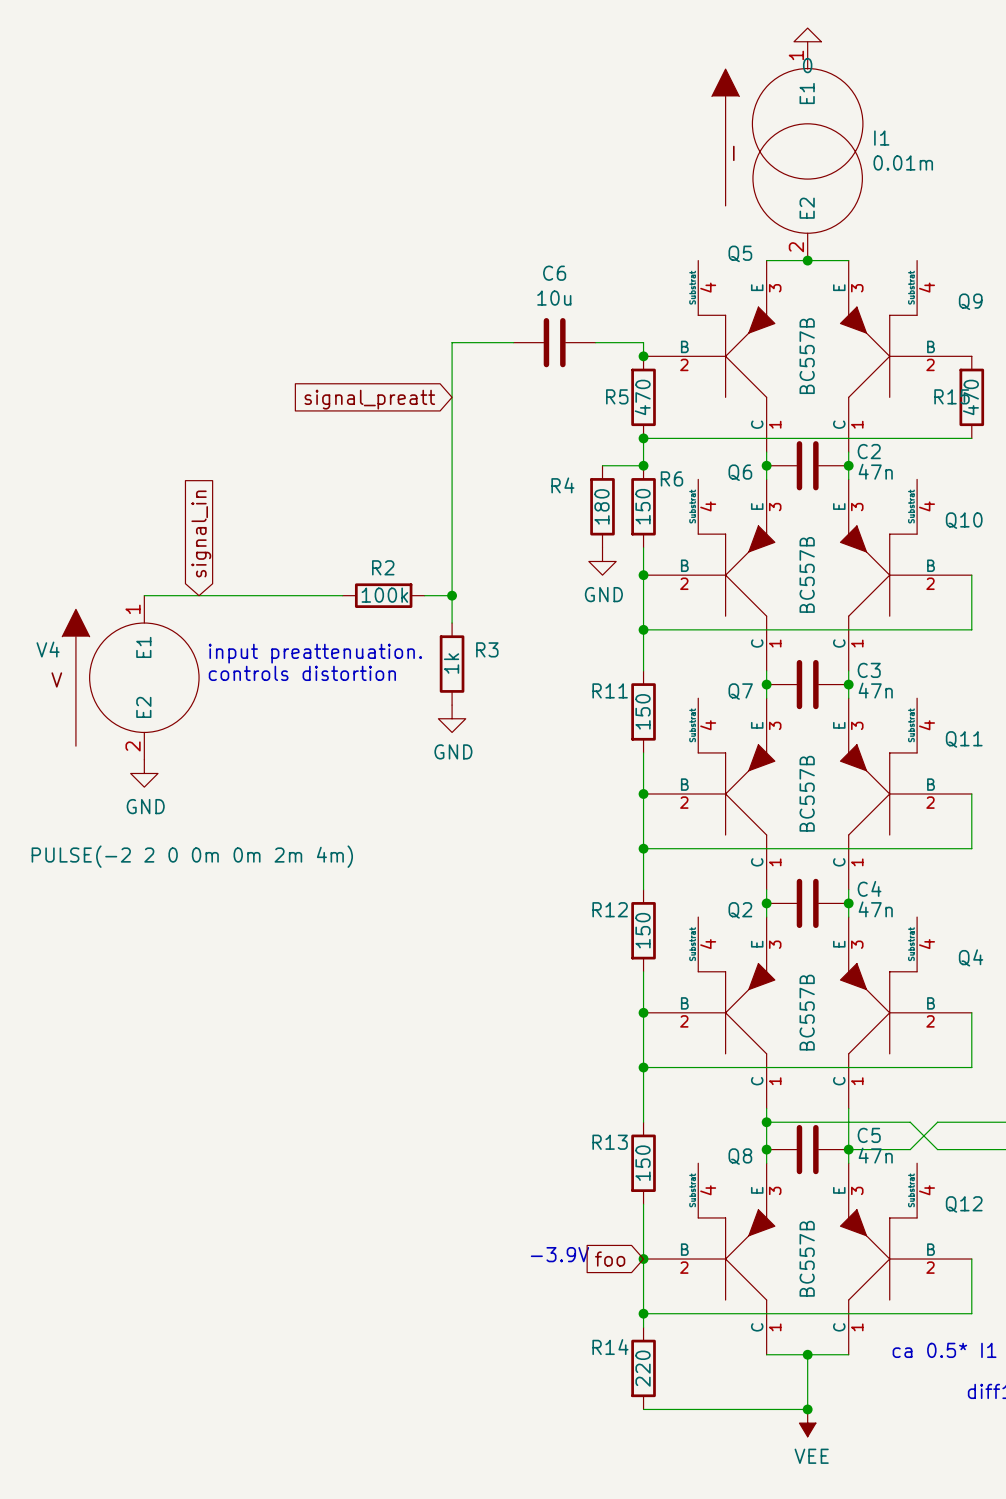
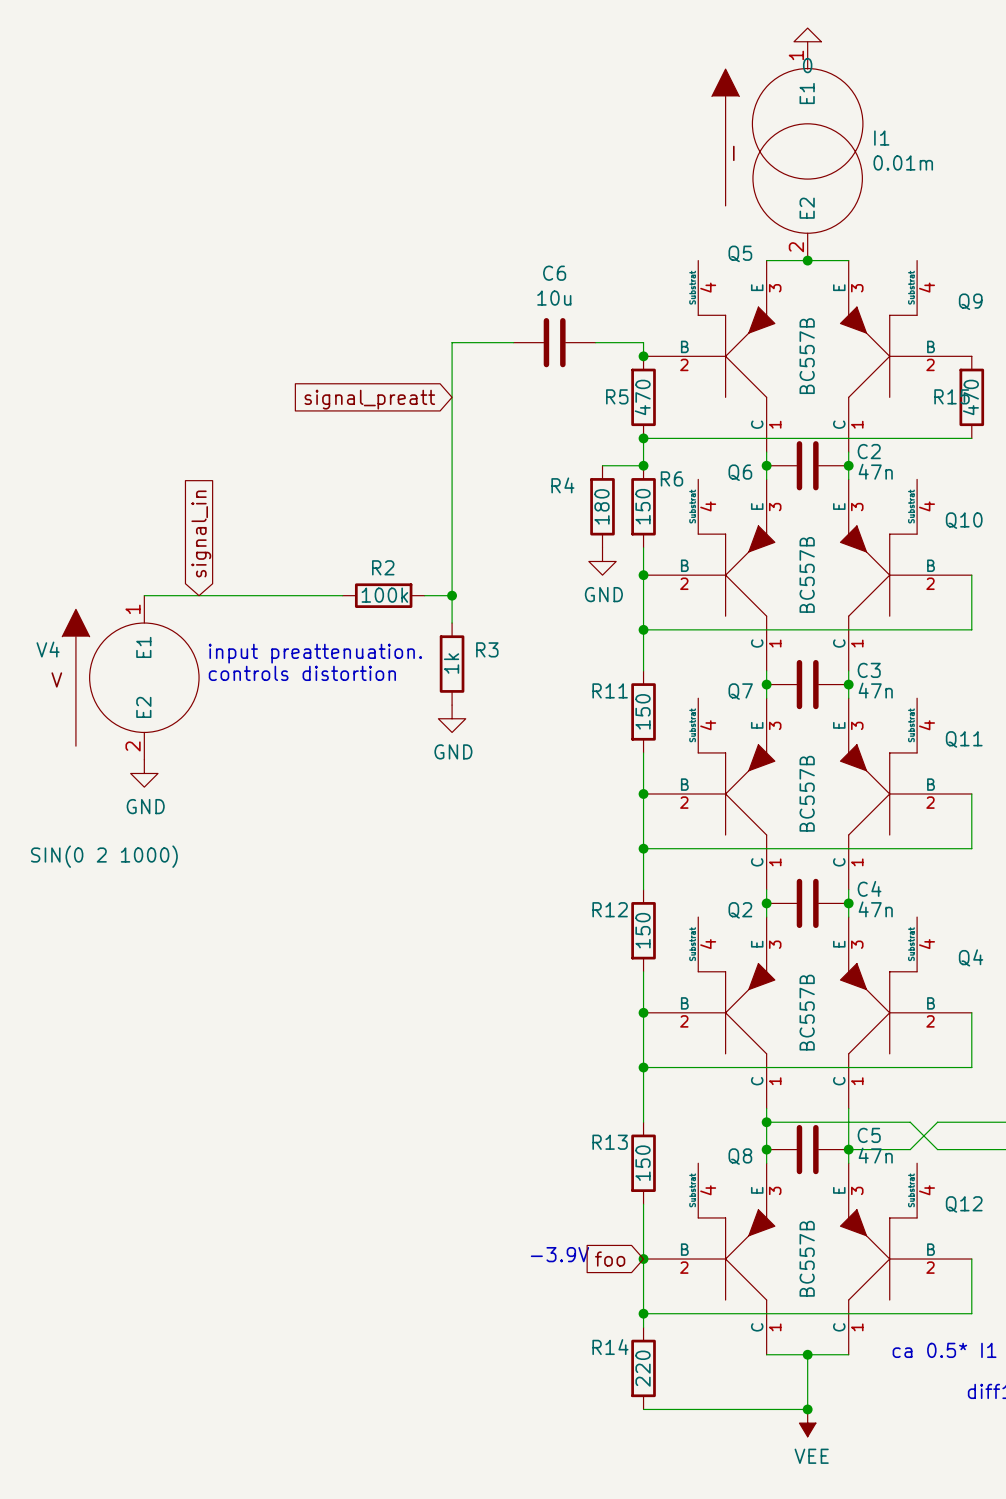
V4 value: PULSE(-2 2 0 0m 0m 2m 4m) (192, 856) -> SIN(0 2 1000) (104, 856)

